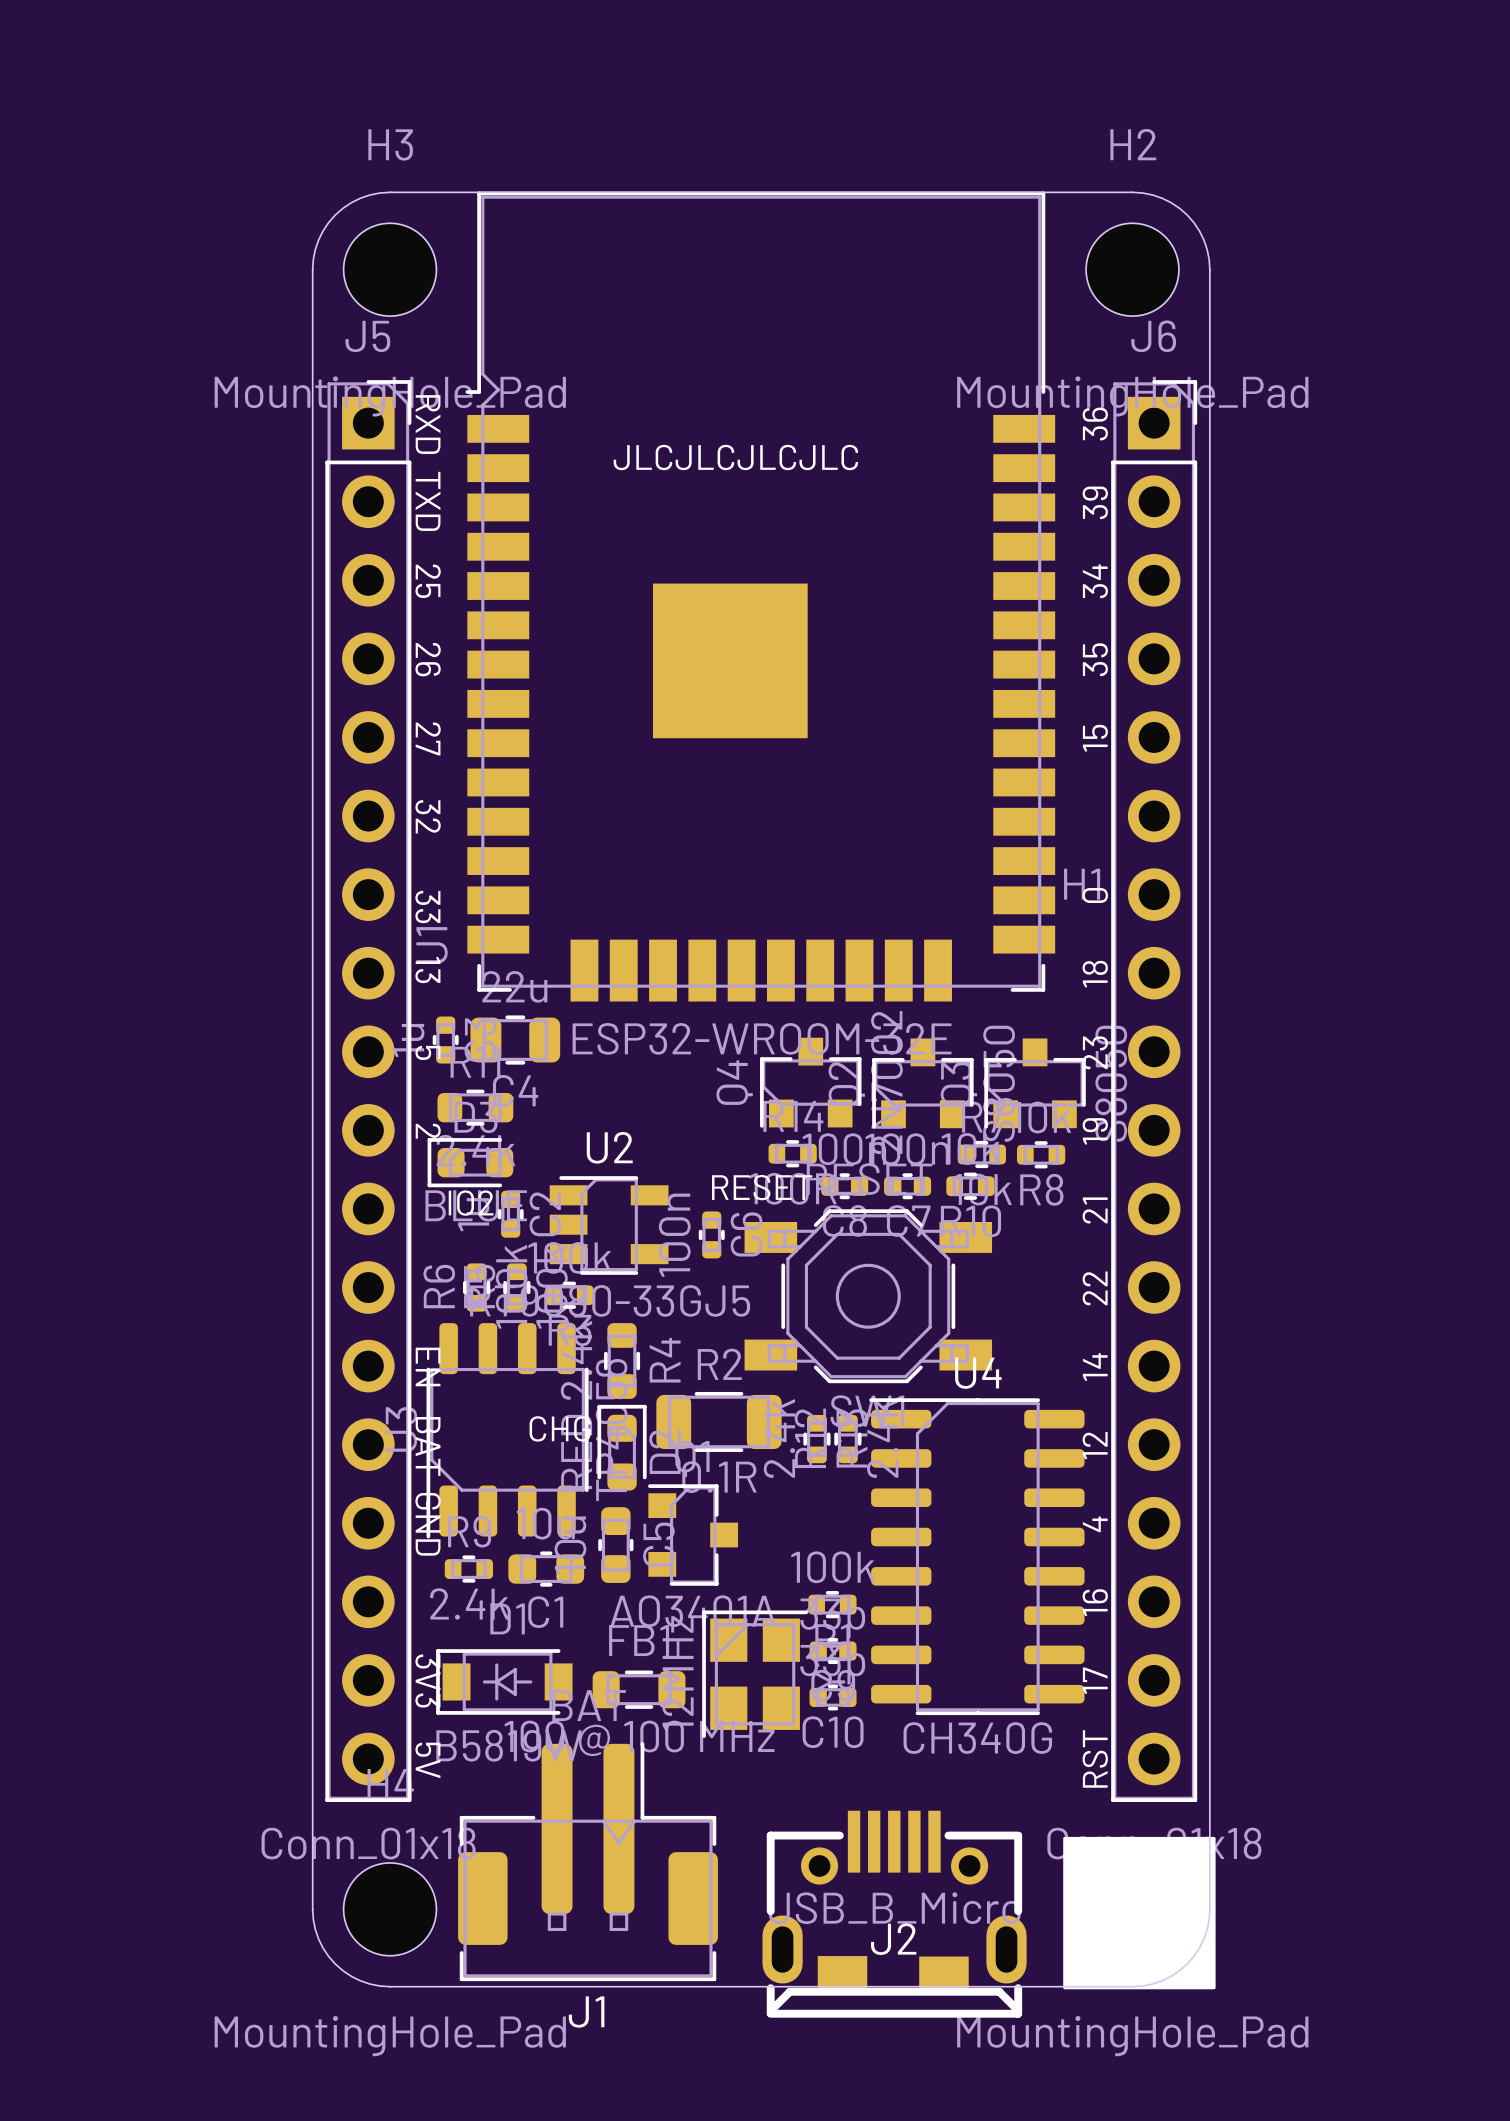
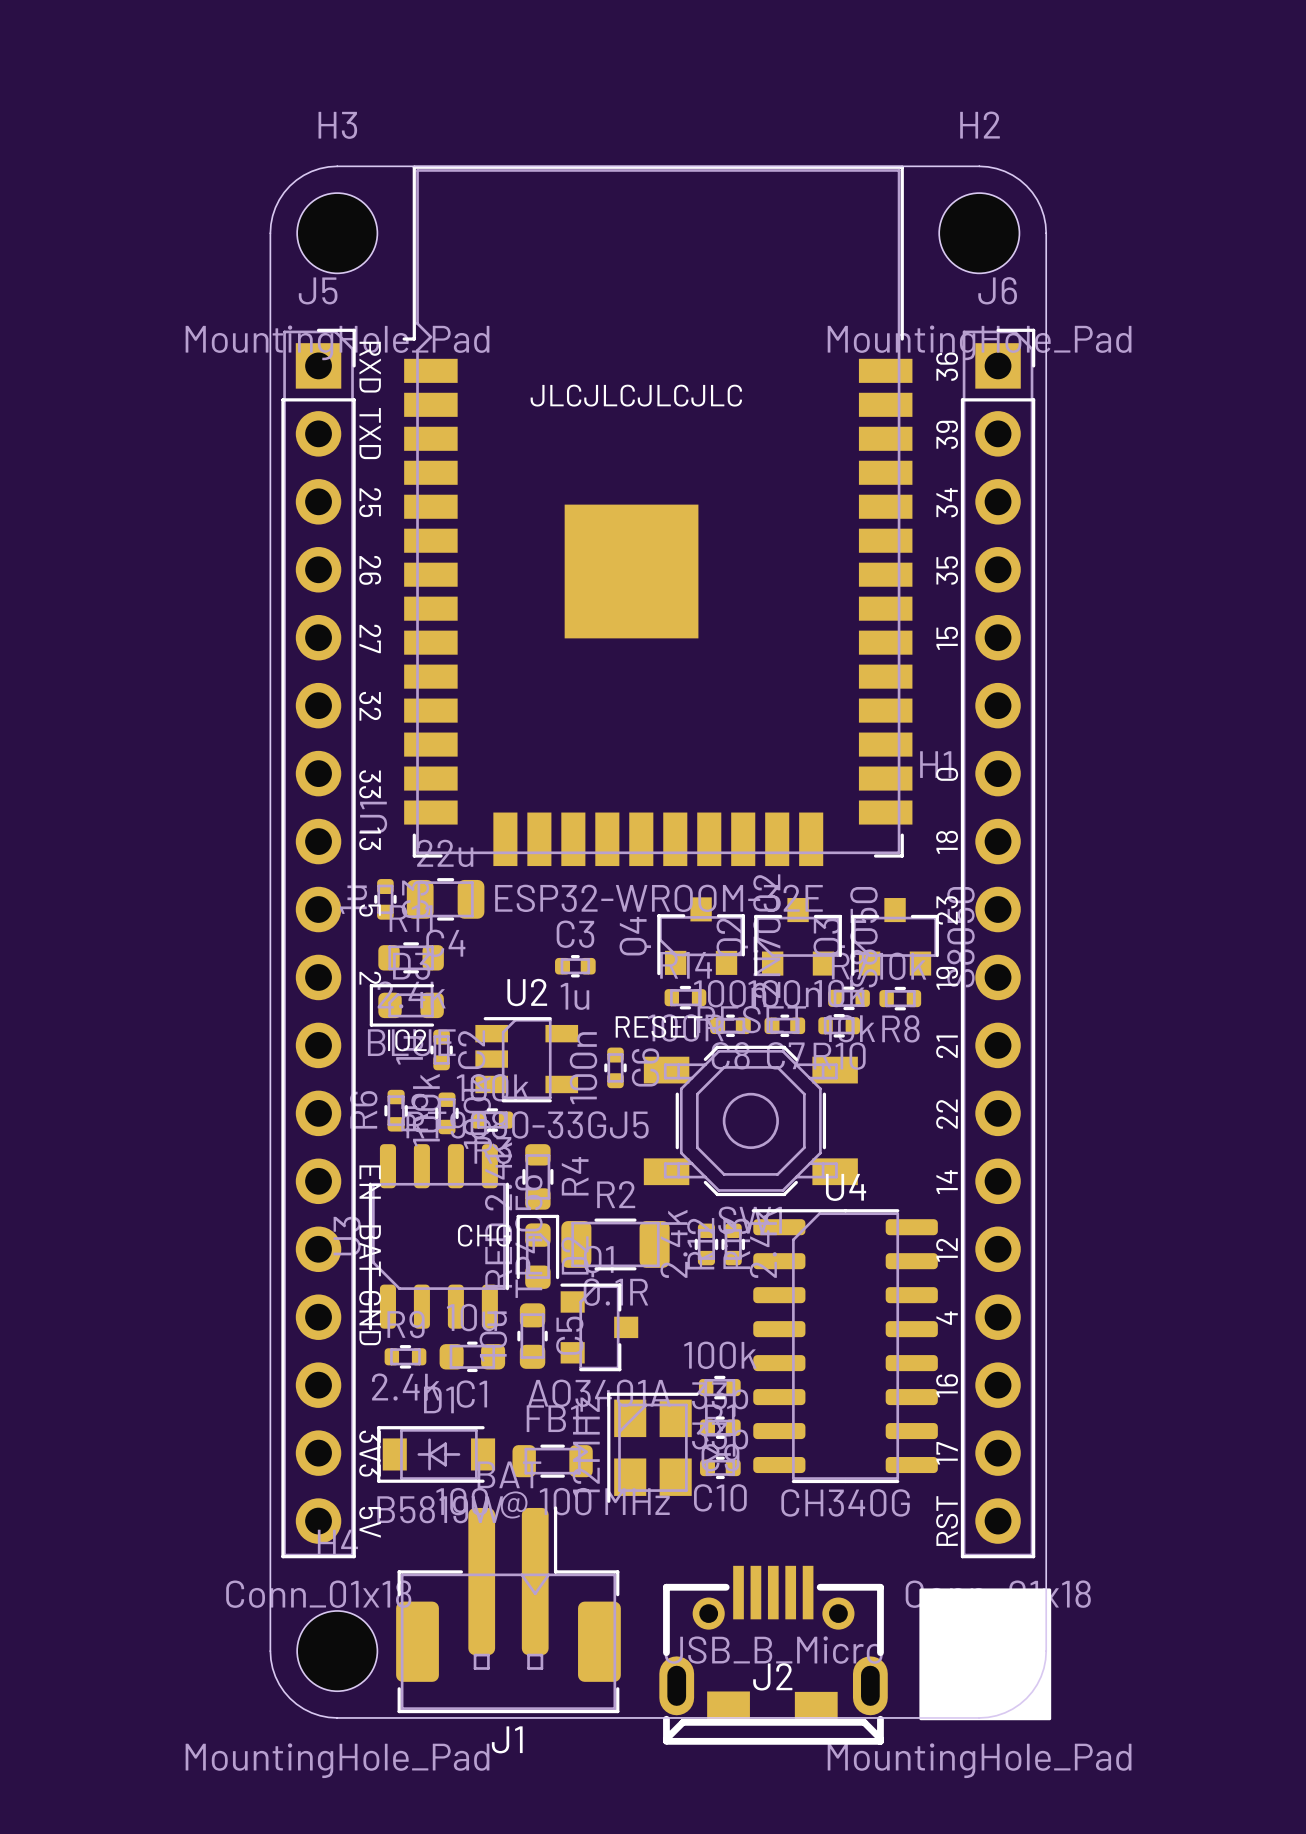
C3: none -> 1u (575, 966)
R6 position: (476, 1287) -> (396, 1110)
R2 position: (719, 1421) -> (615, 1244)

